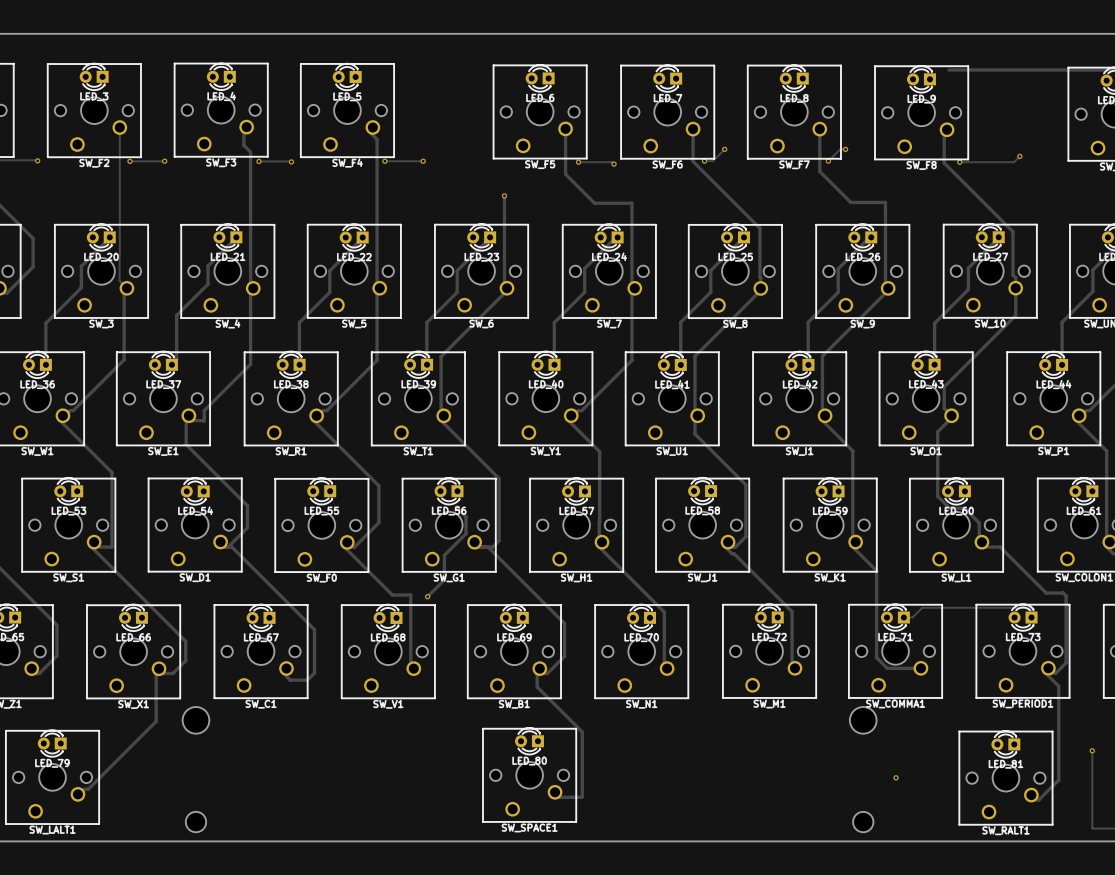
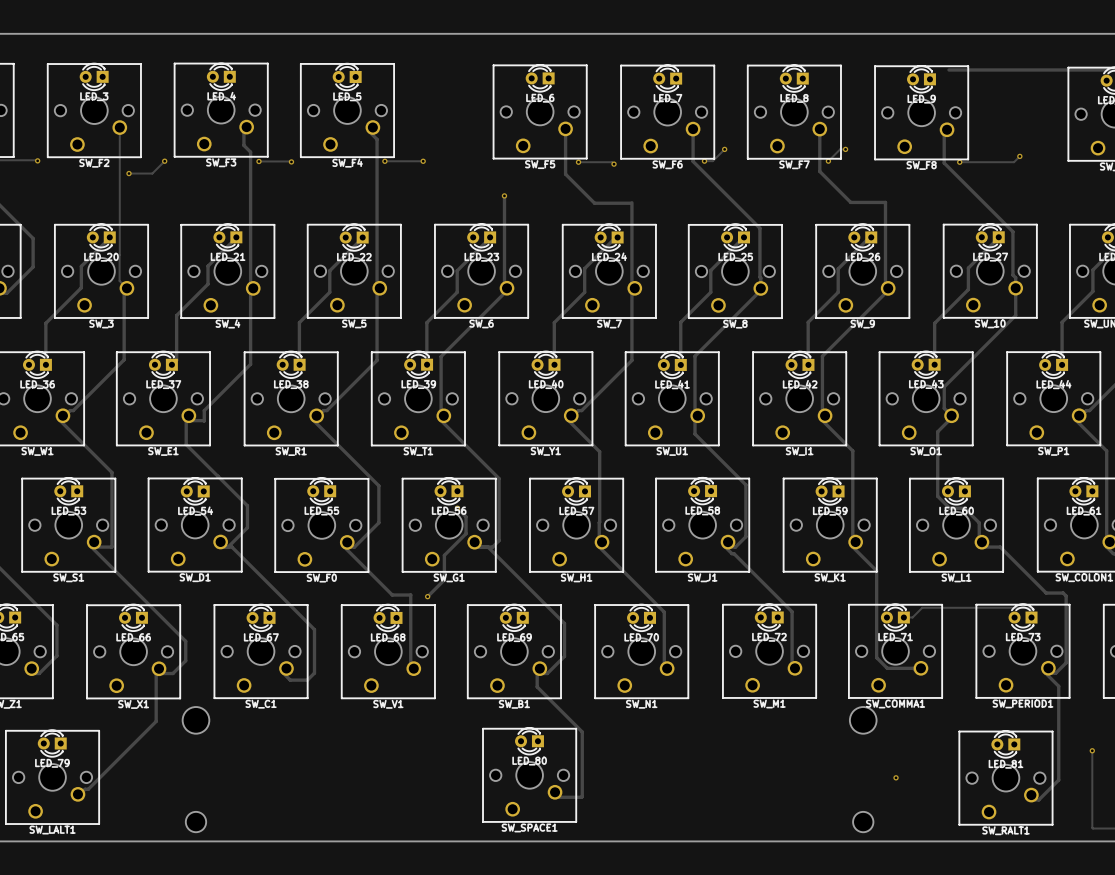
track: (129, 161) (164, 161) -> (129, 173) (152, 173) (164, 161)
via position: (129, 161) -> (129, 173)

